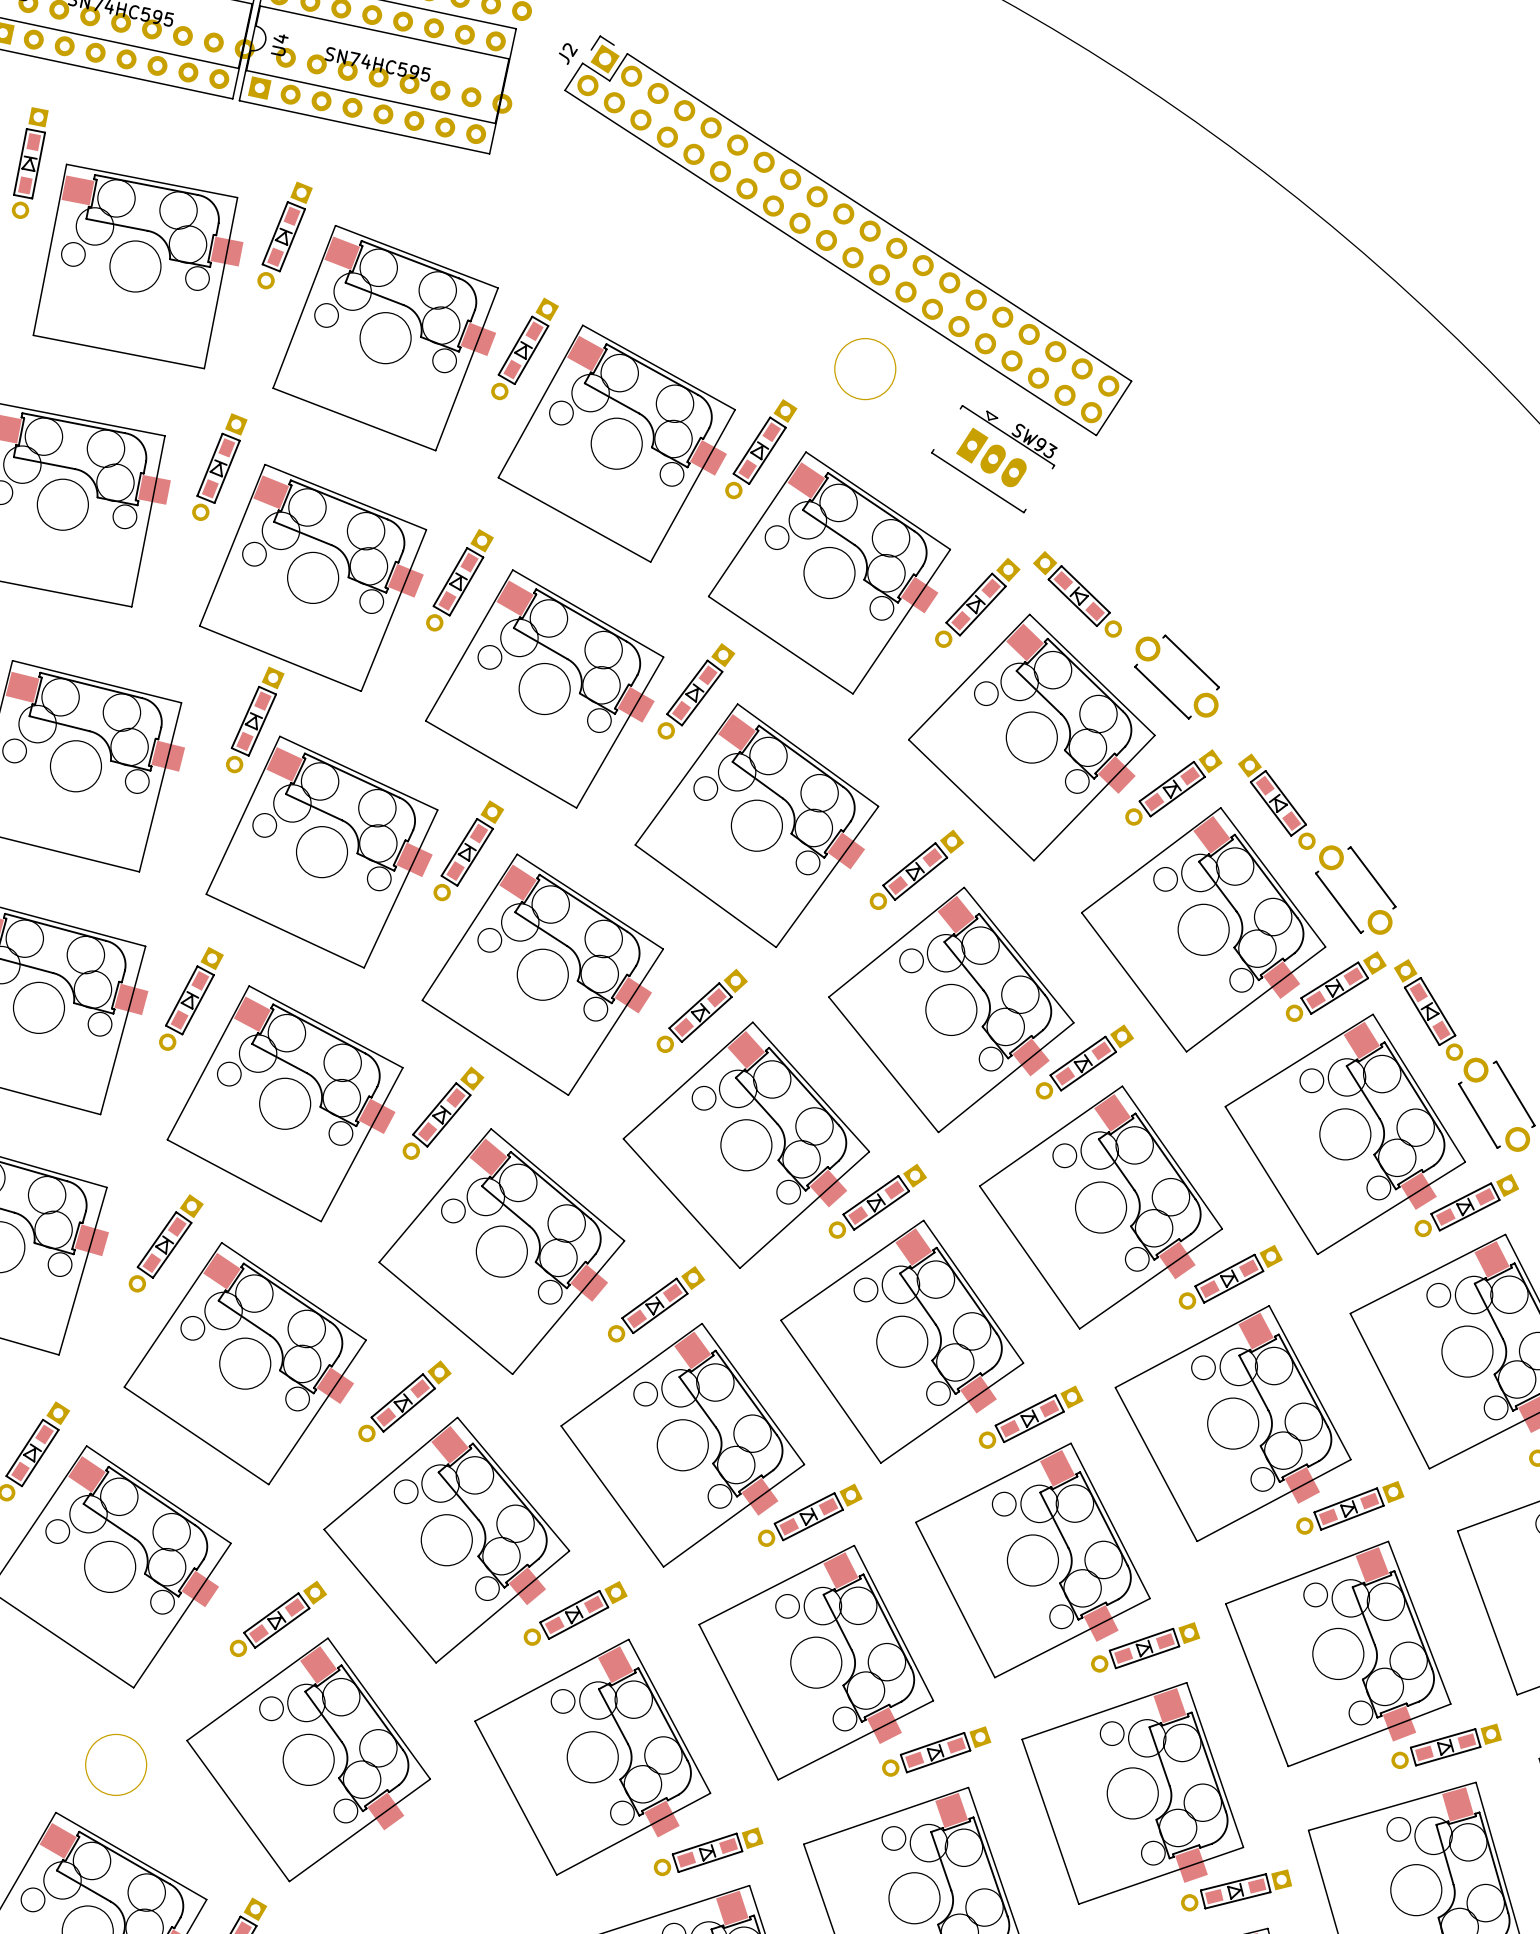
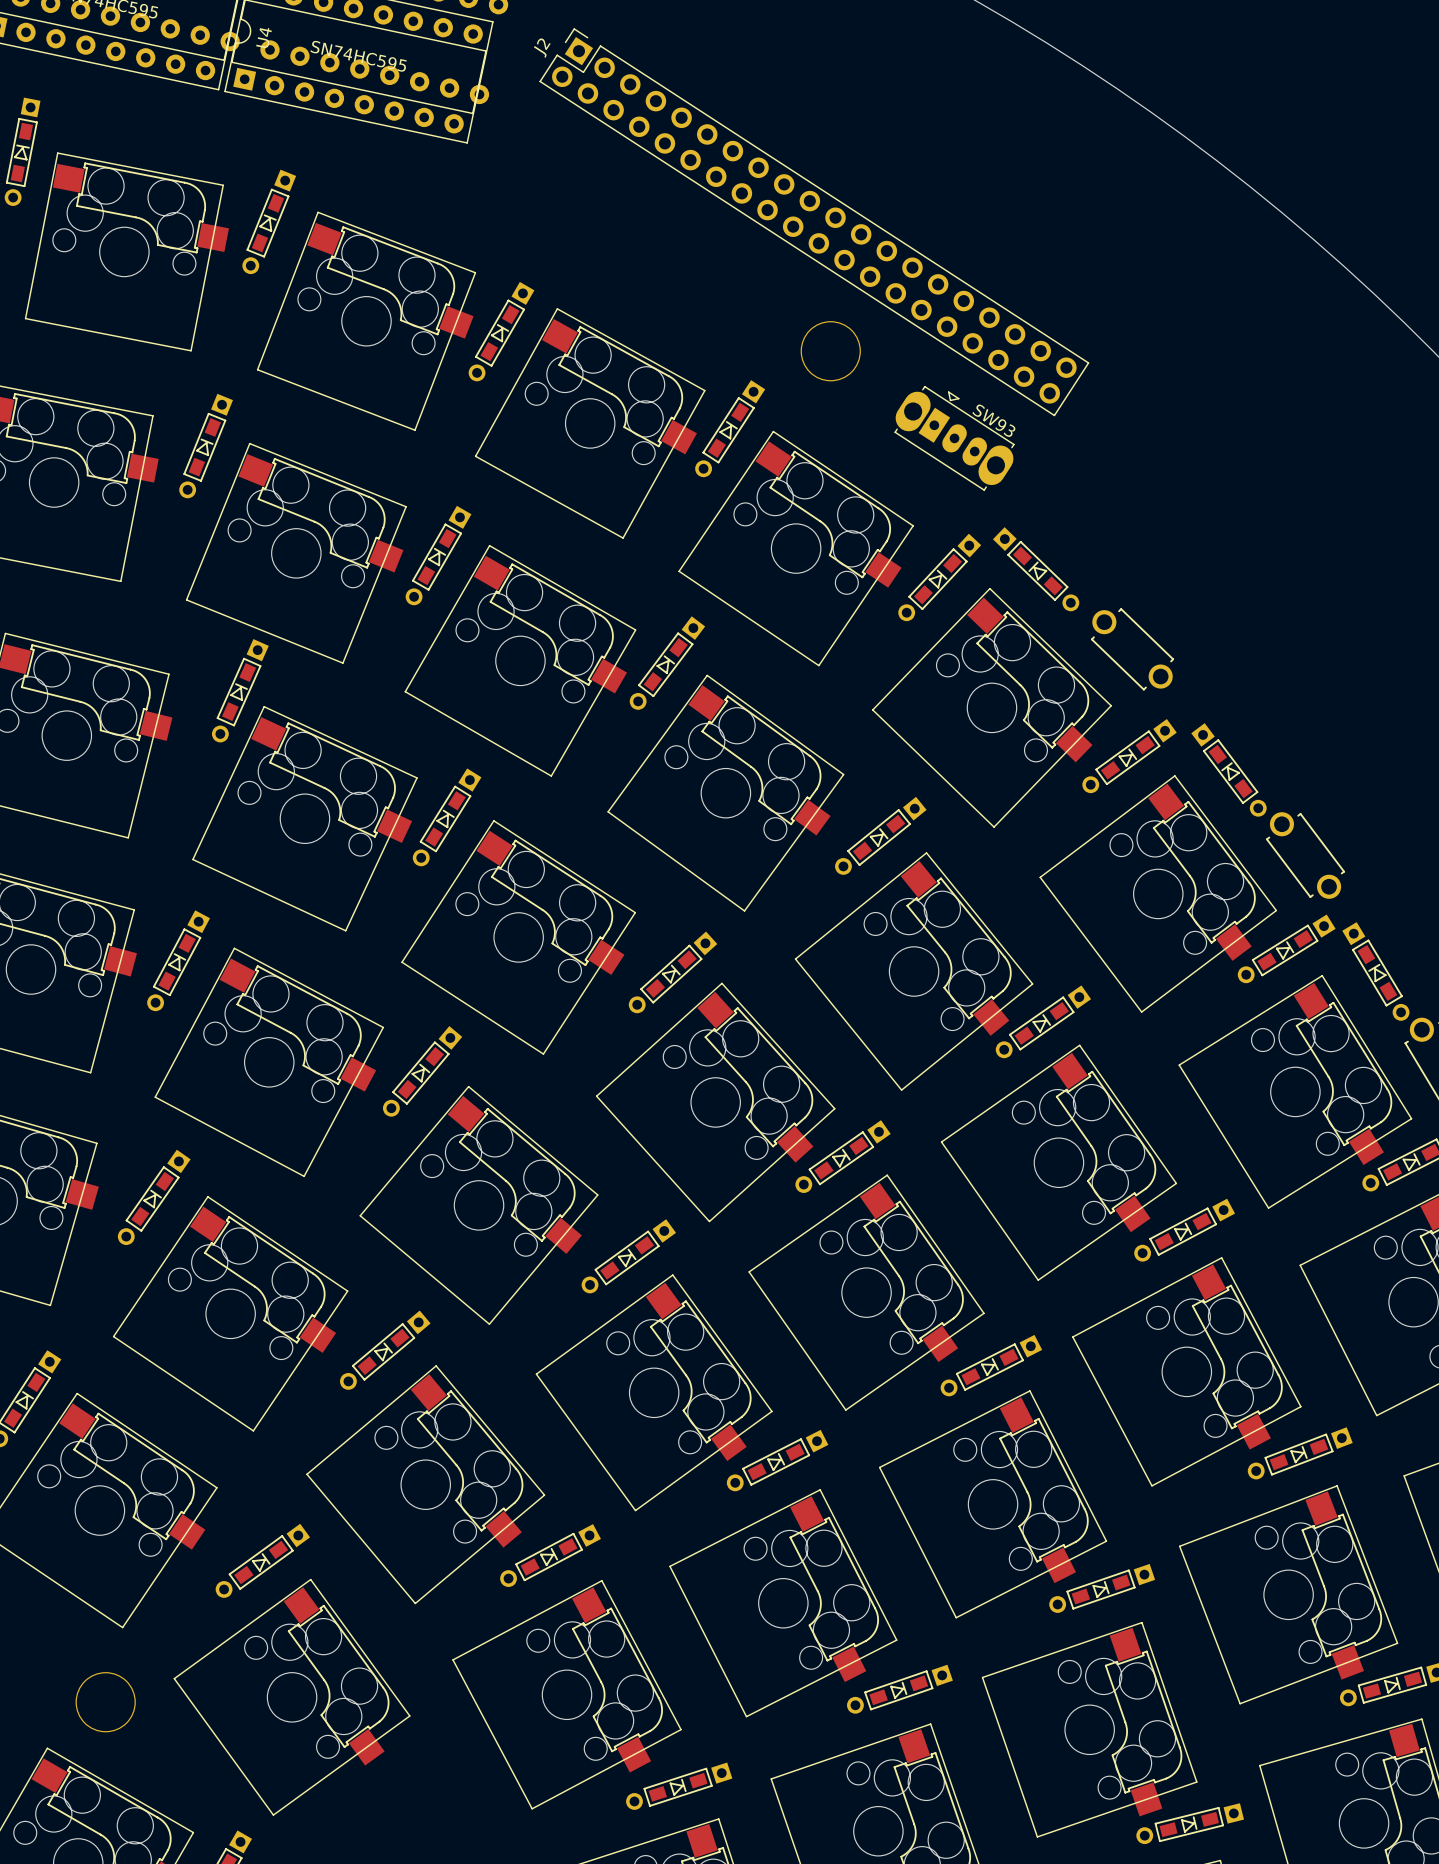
SW93 footprint: [931, 404, 1056, 514] -> [894, 385, 1015, 491]

